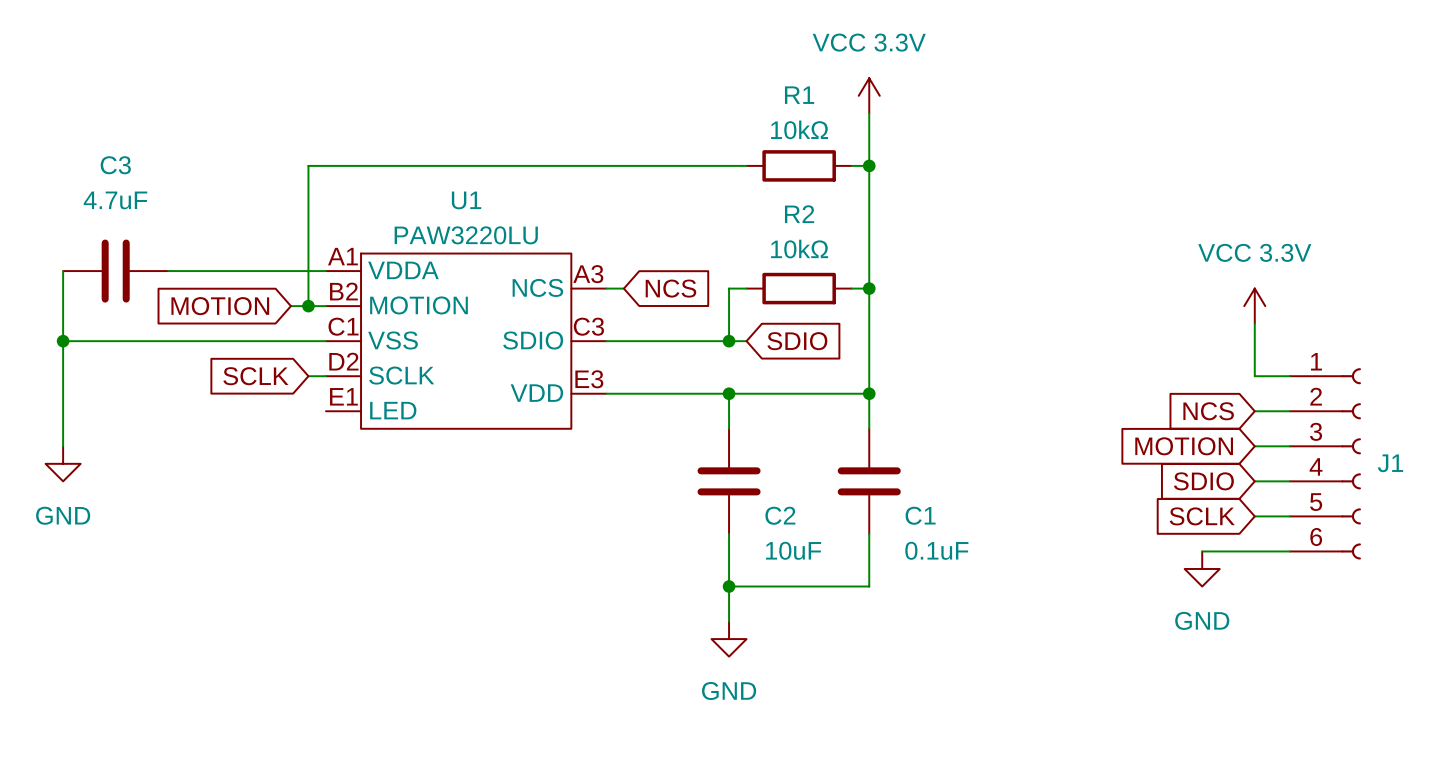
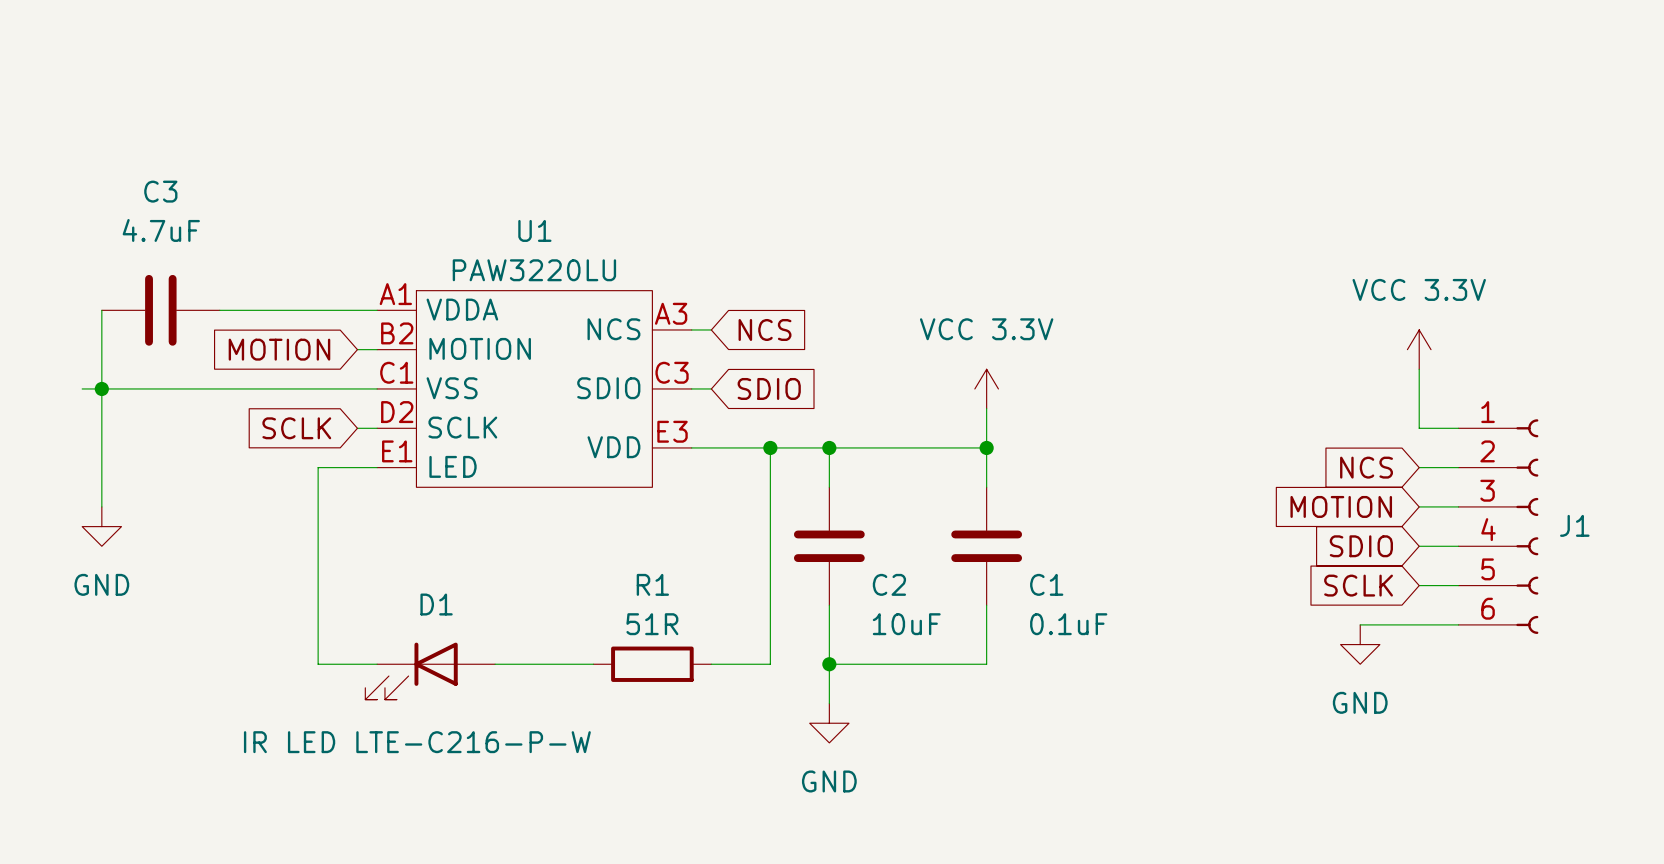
power symbol position: VCC 3.3V (869, 95) -> VCC 3.3V (986, 388)
wire: (869, 113) (869, 358) -> none
R1 value: 10kΩ (799, 129) -> 51R (652, 624)
wire: (746, 165) (308, 165) (308, 306) (290, 306) -> none
R1 position: (799, 165) -> (652, 664)
wire: (851, 165) (869, 165) -> none
junction: (869, 165) -> none
wire: (63, 271) (63, 446) -> (101, 310) (101, 506)
C3 position: (115, 271) -> (160, 310)
wire: (746, 288) (729, 288) (729, 341) -> none
R2: 10kΩ (799, 288) -> none
wire: (851, 288) (869, 288) -> none
junction: (869, 288) -> none
global label position: MOTION (220, 306) -> MOTION (279, 349)
junction: (308, 306) -> none
junction position: (63, 341) -> (101, 388)
wire: (623, 341) (746, 341) -> none
junction position: (729, 341) -> (770, 447)
global label position: SDIO (797, 341) -> SDIO (769, 388)
wire: none -> (770, 447) (770, 664) (711, 664)
wire: none -> (377, 467) (318, 467) (318, 664) (377, 664)
power symbol position: GND (63, 463) -> GND (101, 526)
wire: none -> (495, 664) (593, 664)
D1: none -> IR LED LTE-C216-P-W (430, 671)

